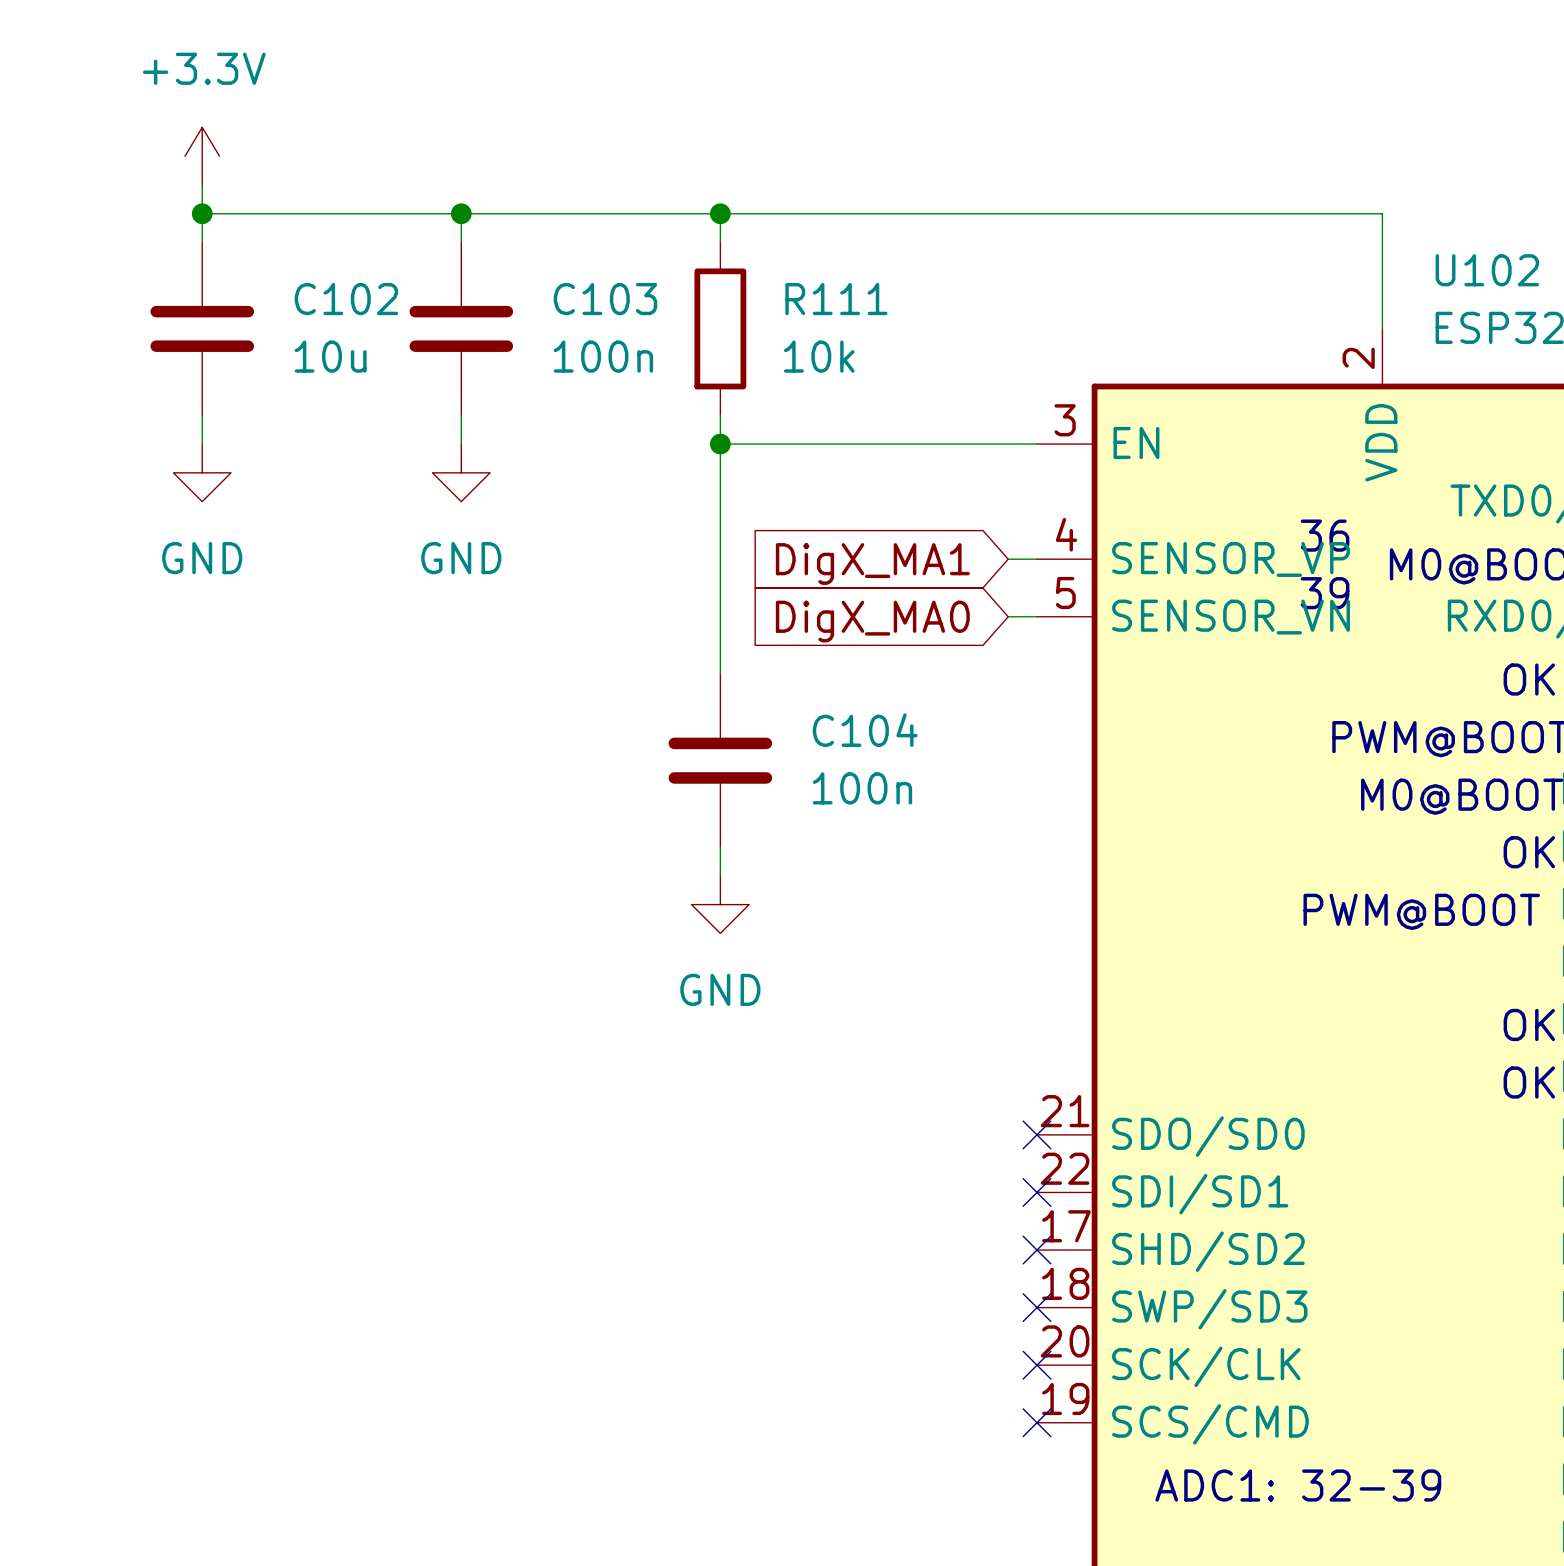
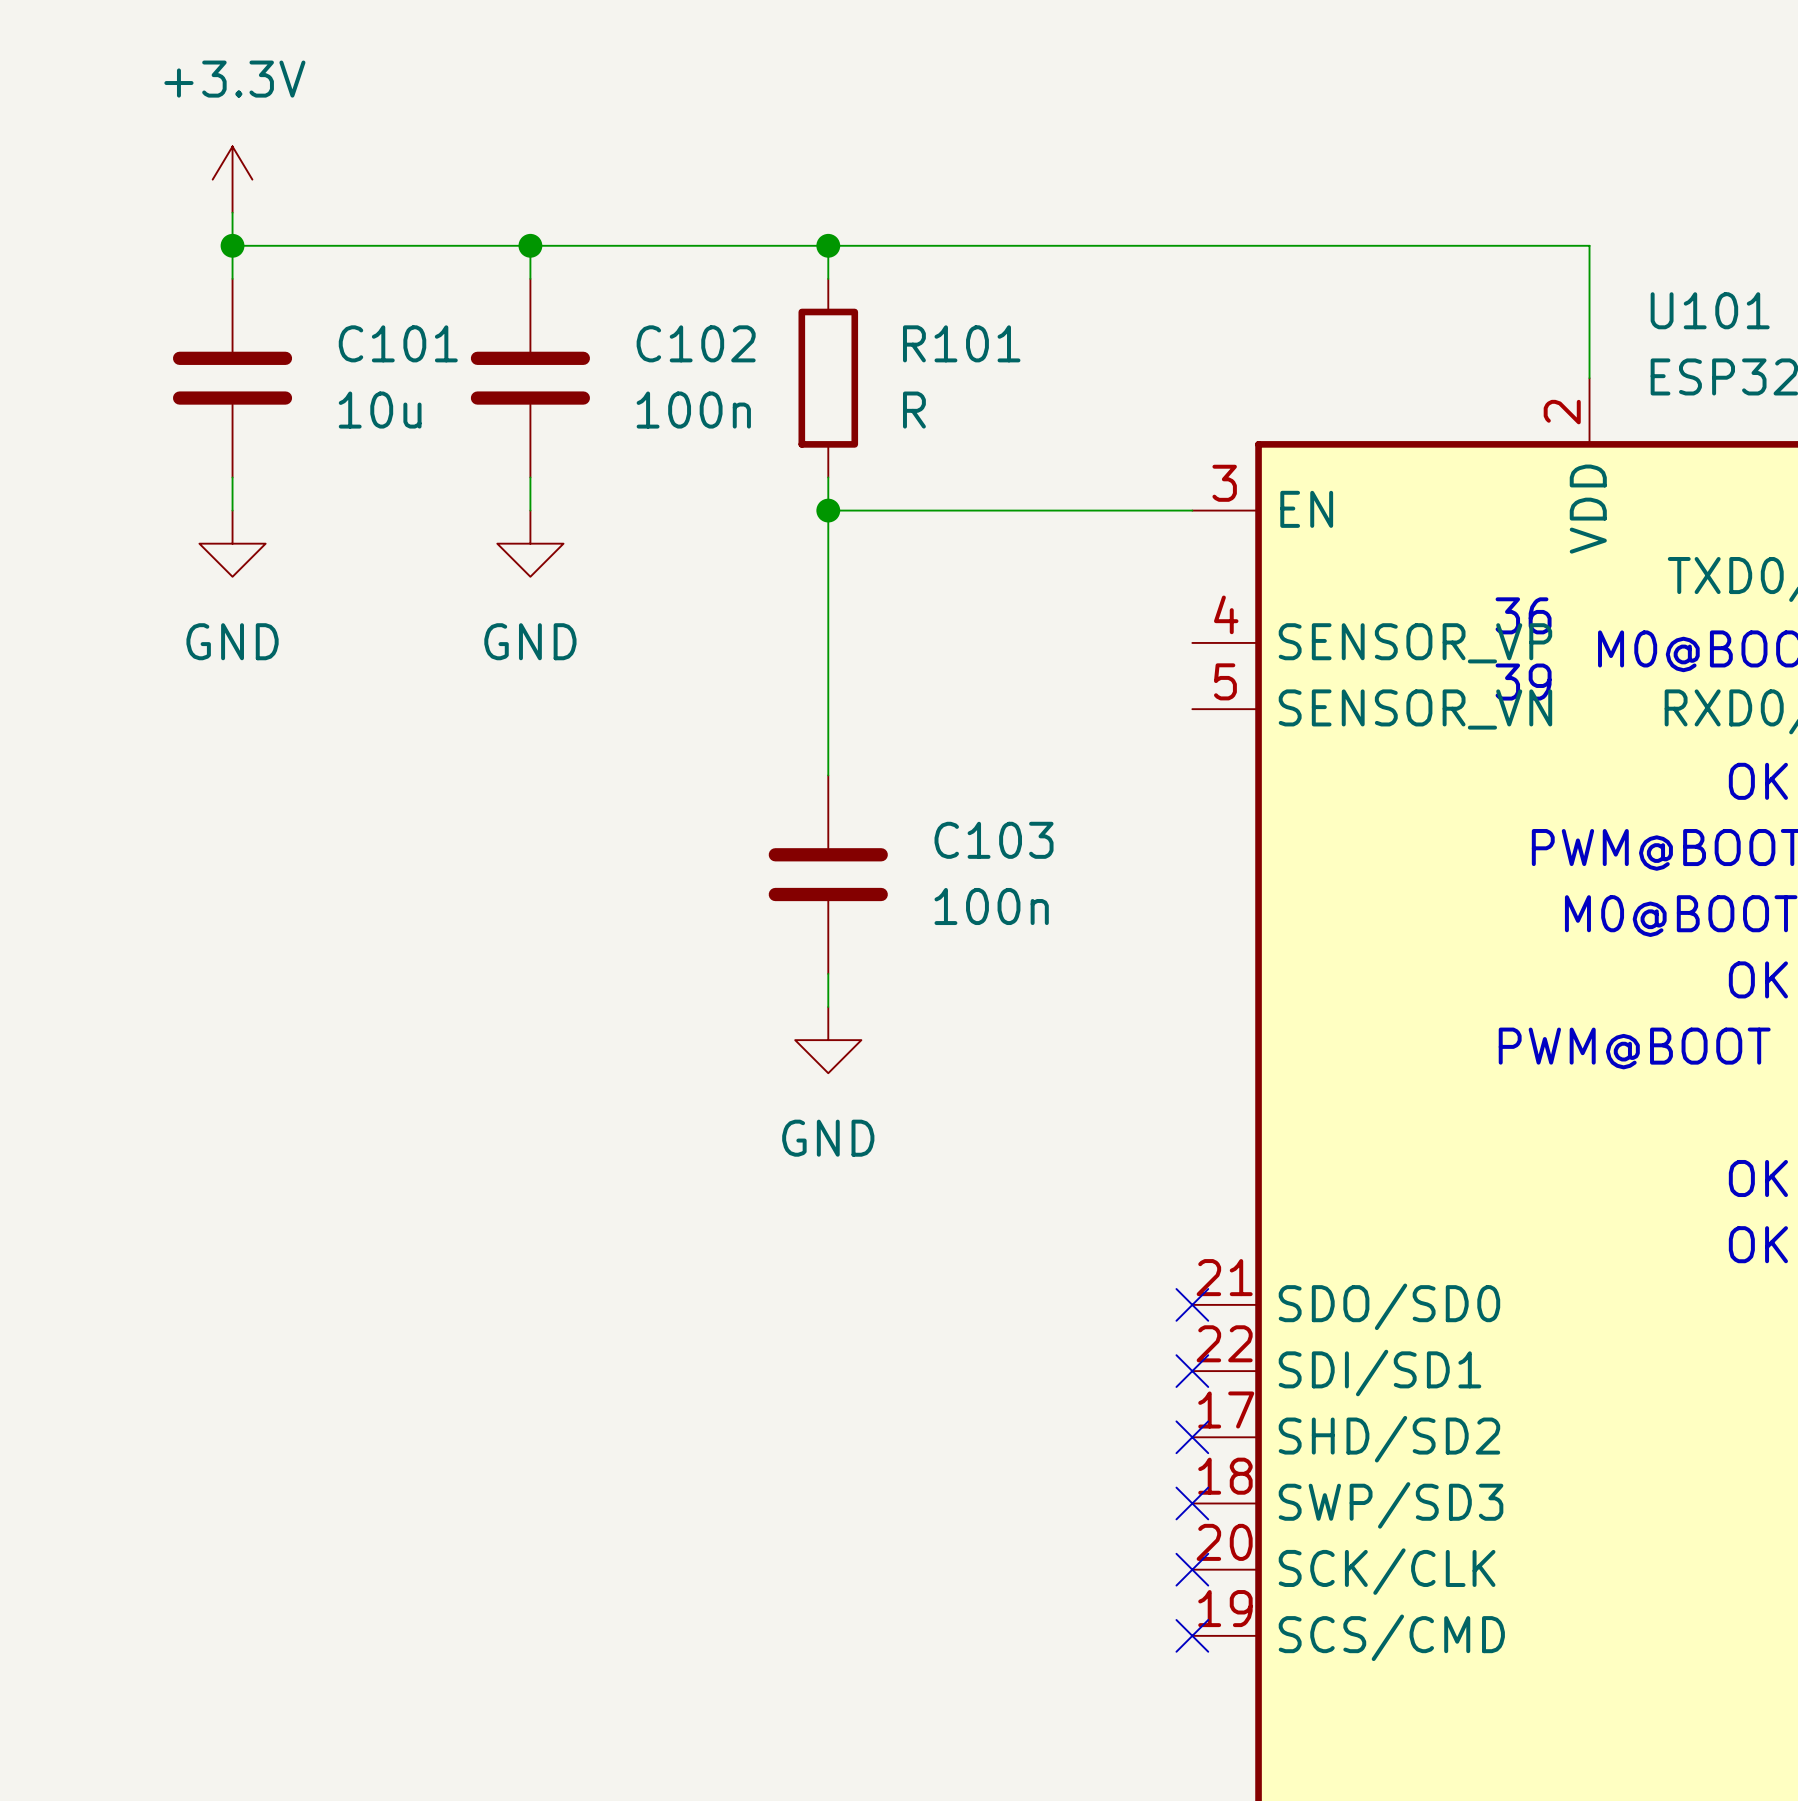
U102 name: U102 (1487, 270) -> U101 (1710, 310)
C102 name: C102 (346, 299) -> C101 (398, 343)
C103 name: C103 (605, 299) -> C102 (696, 343)
R111 name: R111 (836, 299) -> R101 (961, 343)
R111 value: 10k (819, 356) -> R (914, 410)
wire: (1008, 559) (1037, 559) -> none
global label: DigX_MA1 (872, 563) -> none
wire: (1008, 616) (1037, 616) -> none
global label: DigX_MA0 (872, 621) -> none
C104 name: C104 (865, 730) -> C103 (994, 840)
text: ADC1: 32-39 (1298, 1485) -> none

